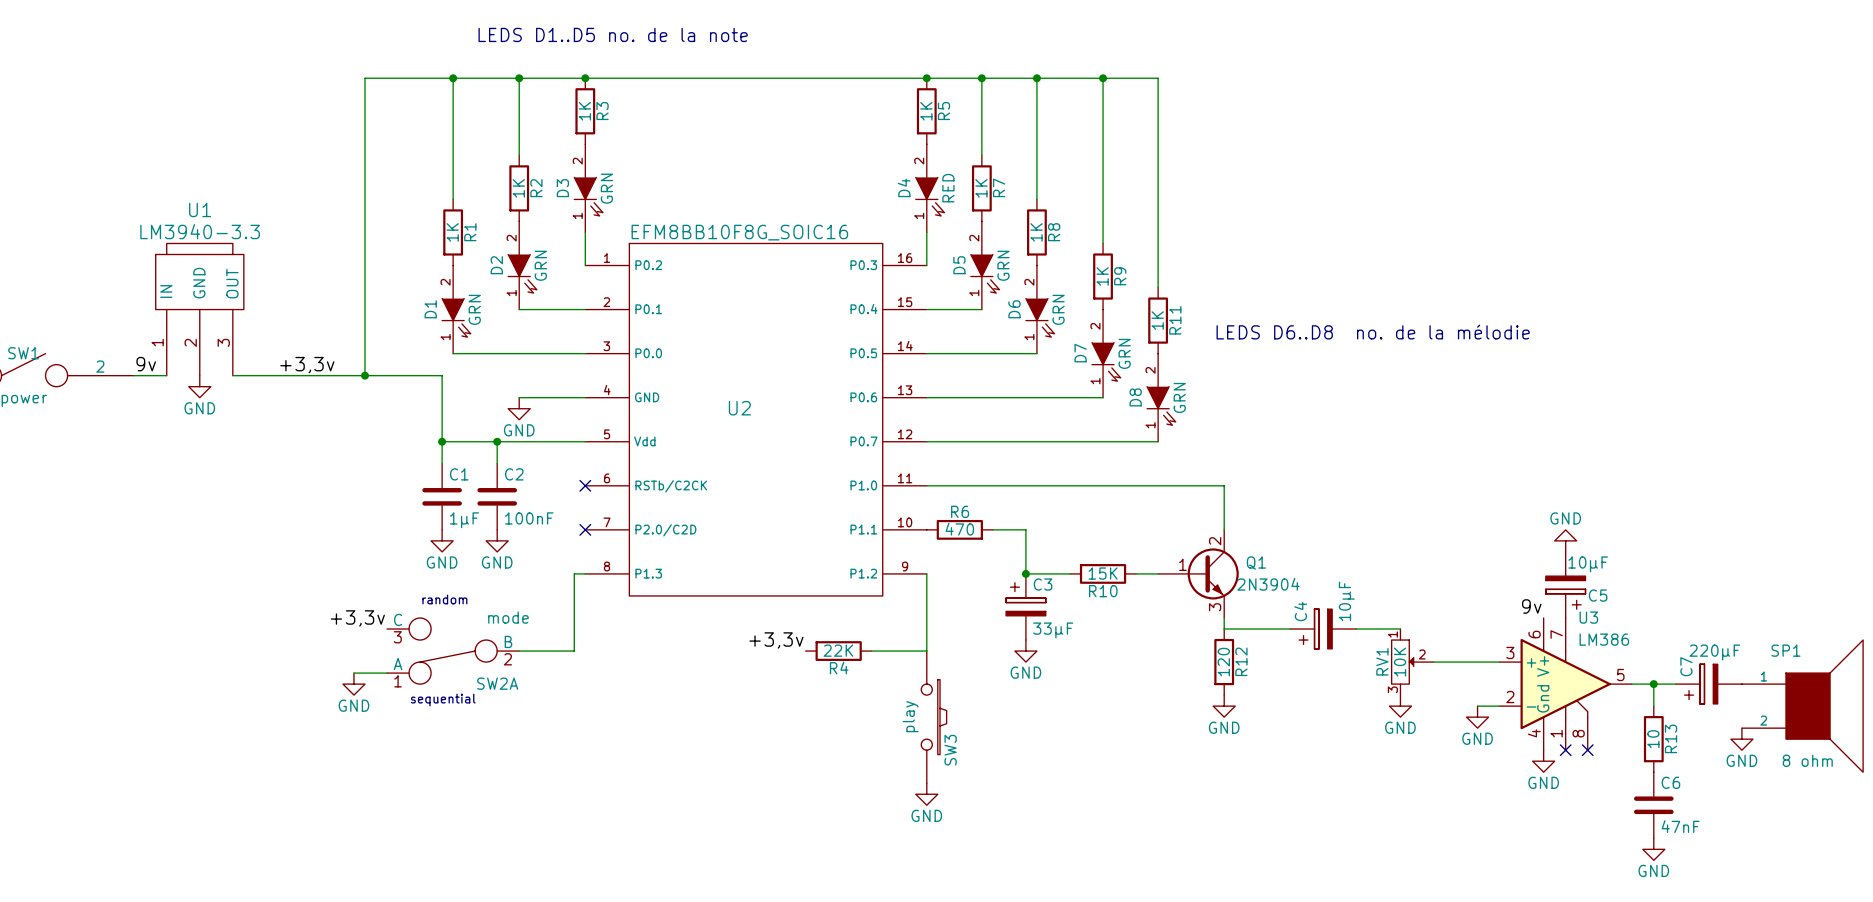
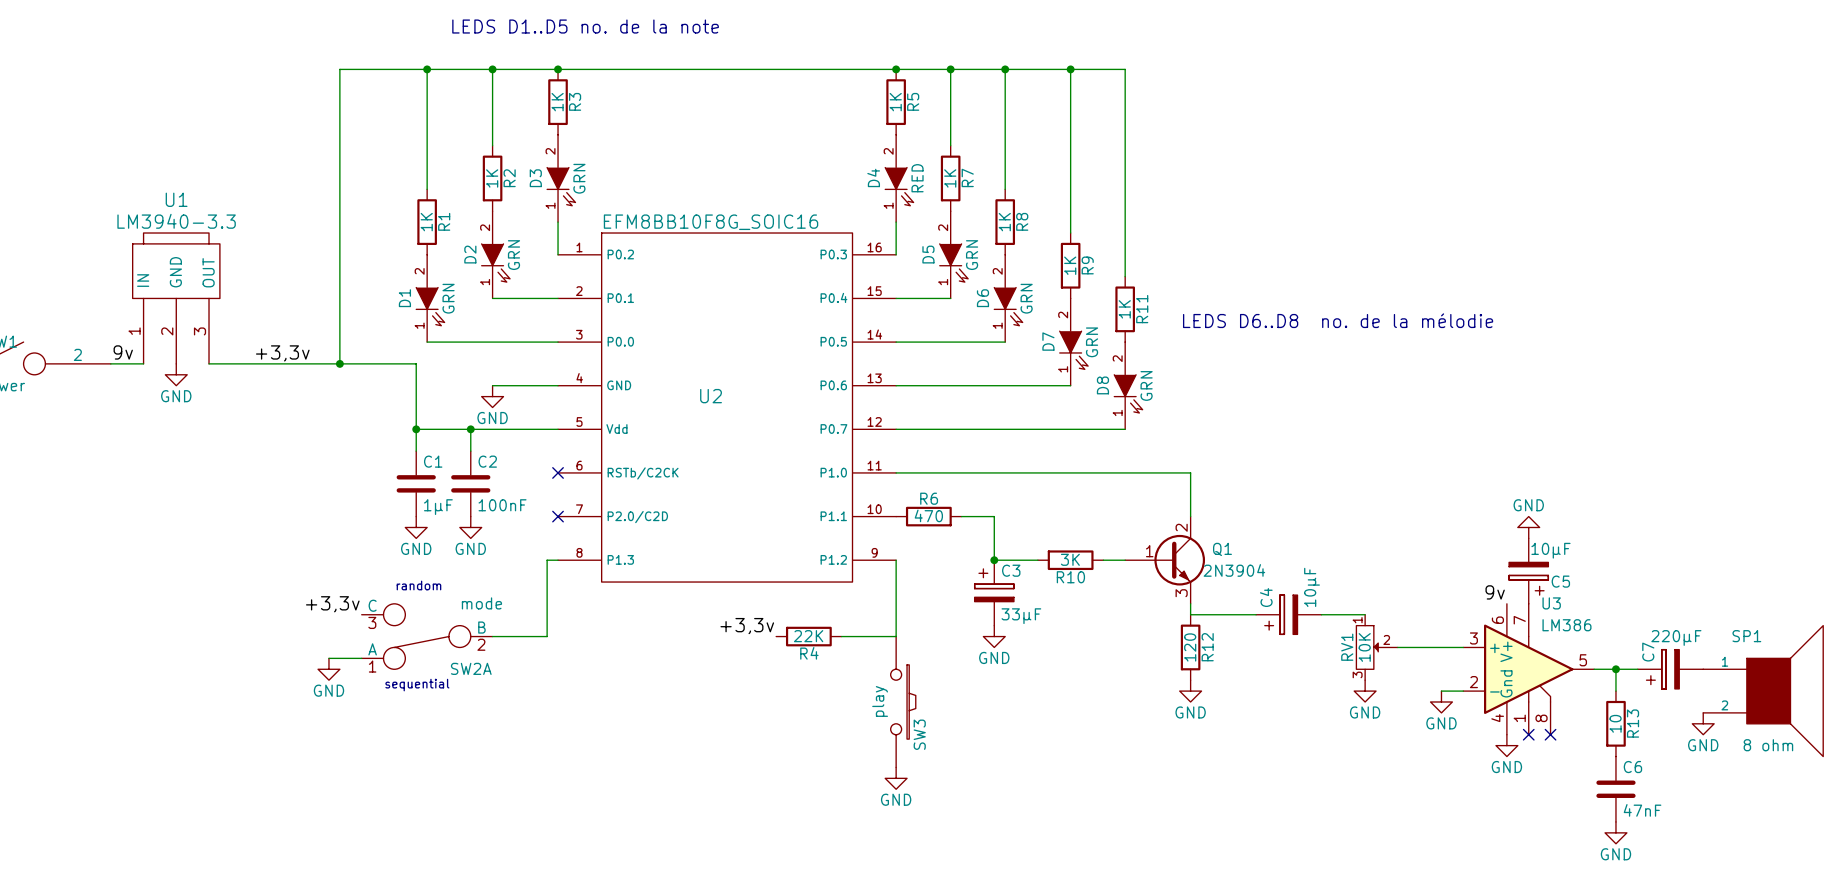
R10 value: 15K (1103, 573) -> 3K (1070, 559)

